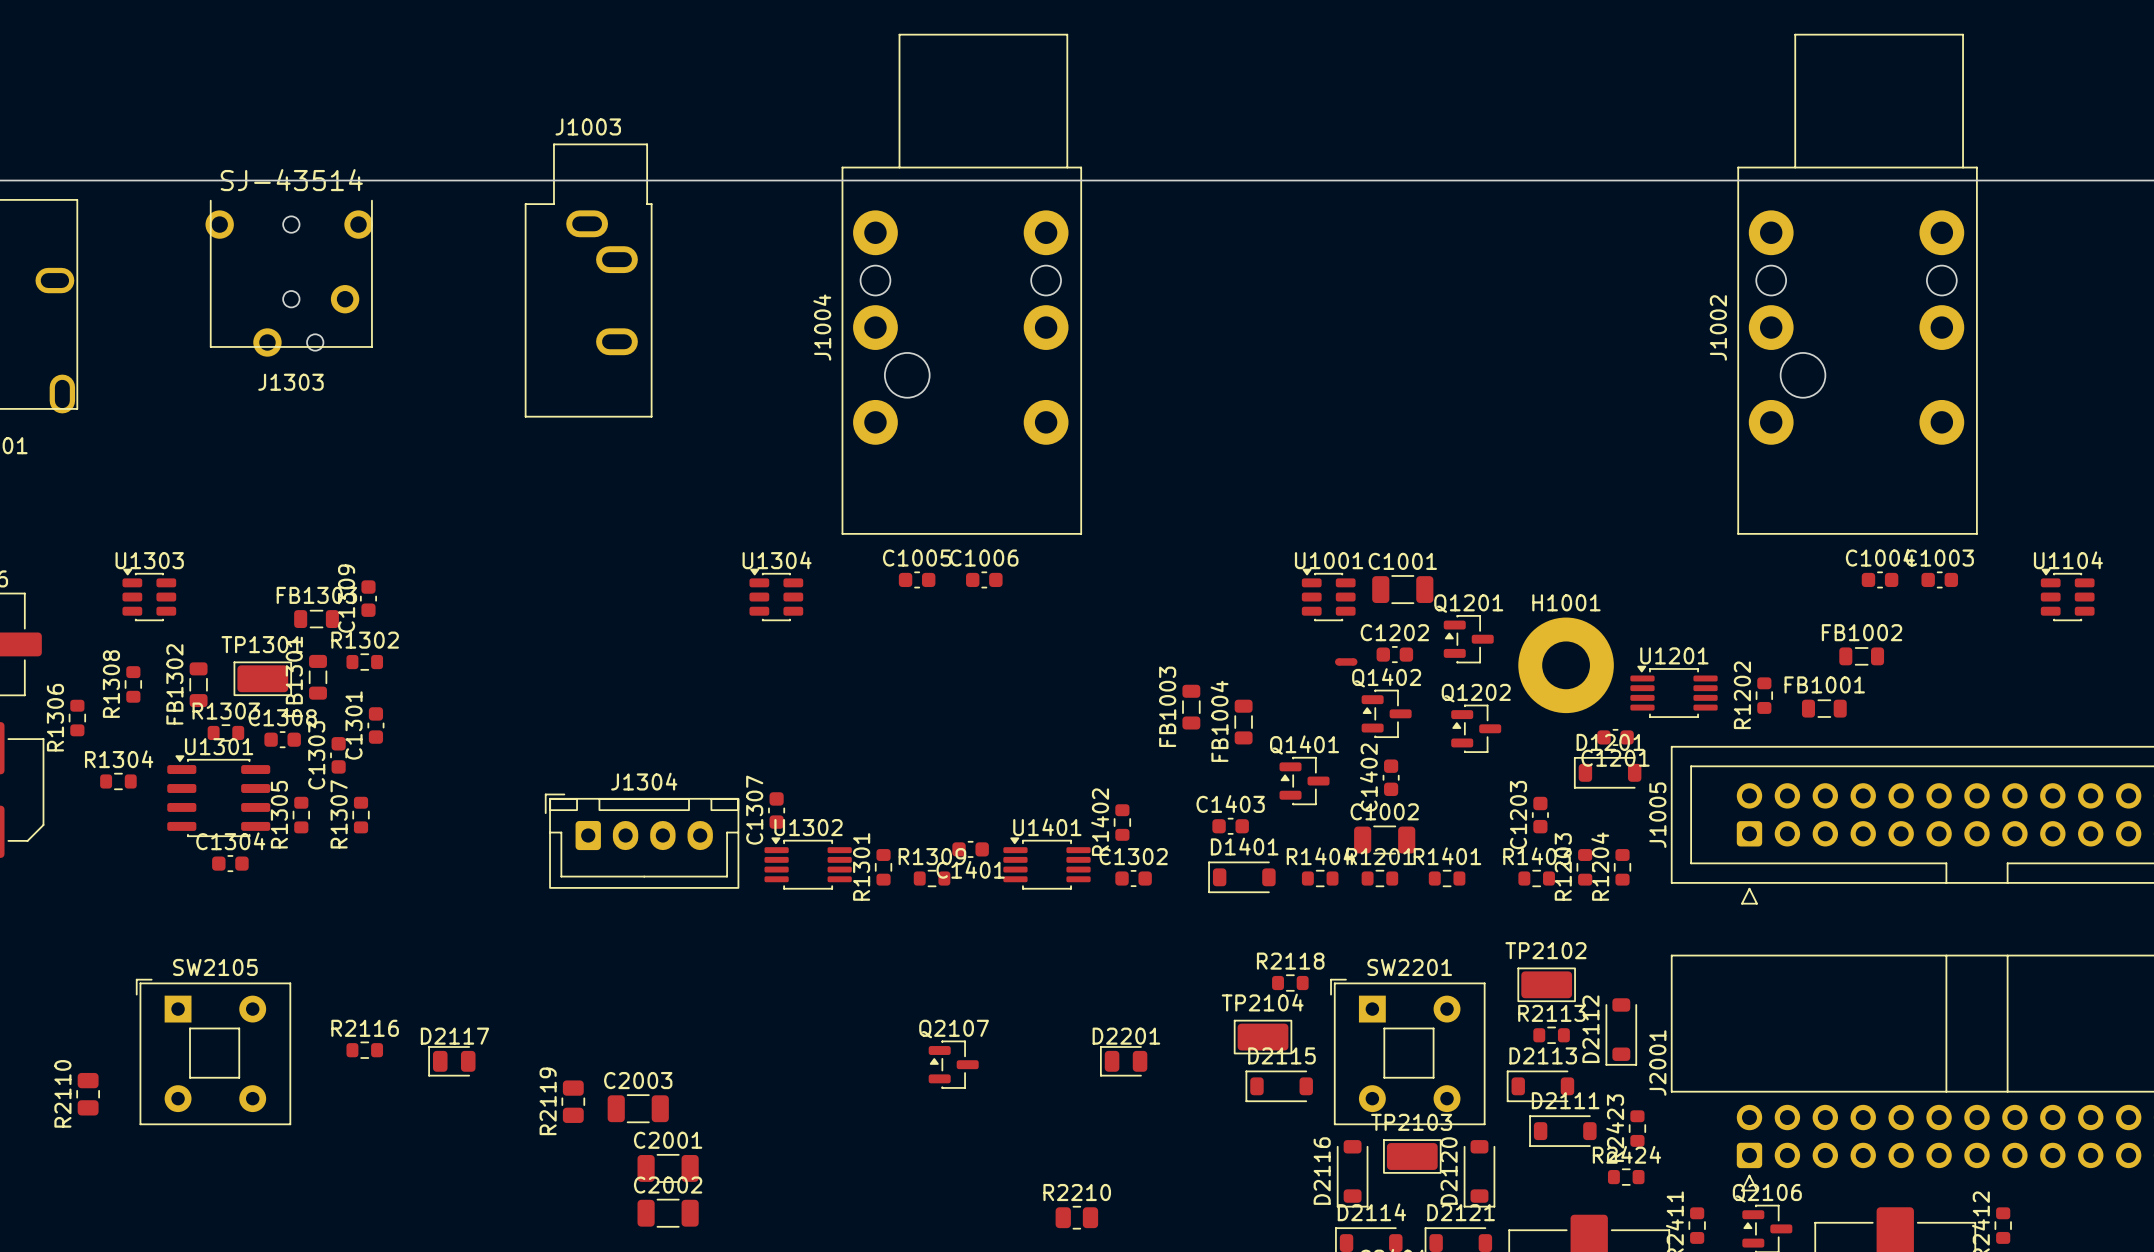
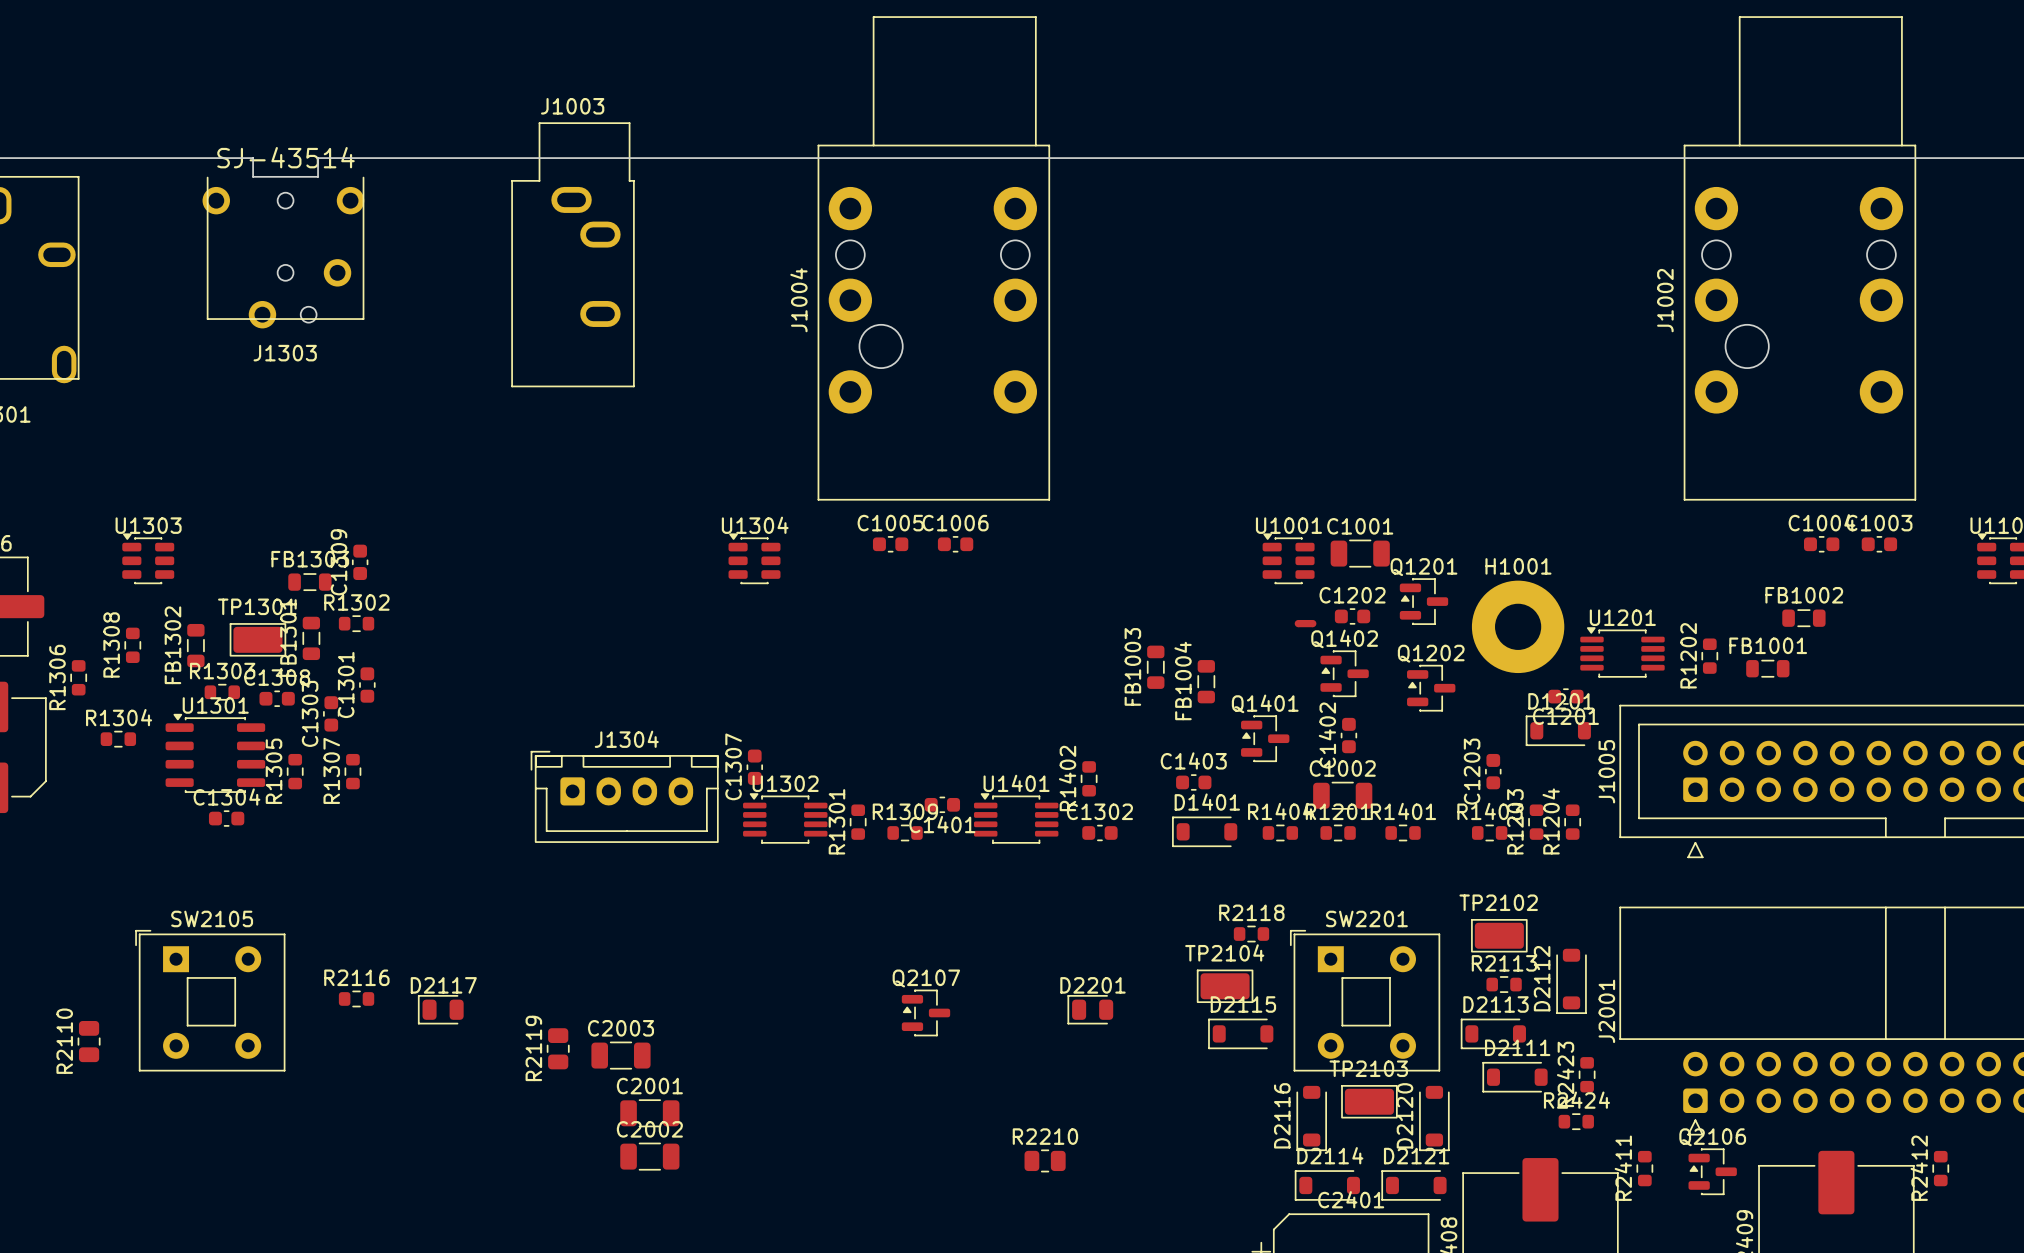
board edge: (257, 180) (324, 180) -> (253, 158) (253, 176) (318, 176) (318, 158)

